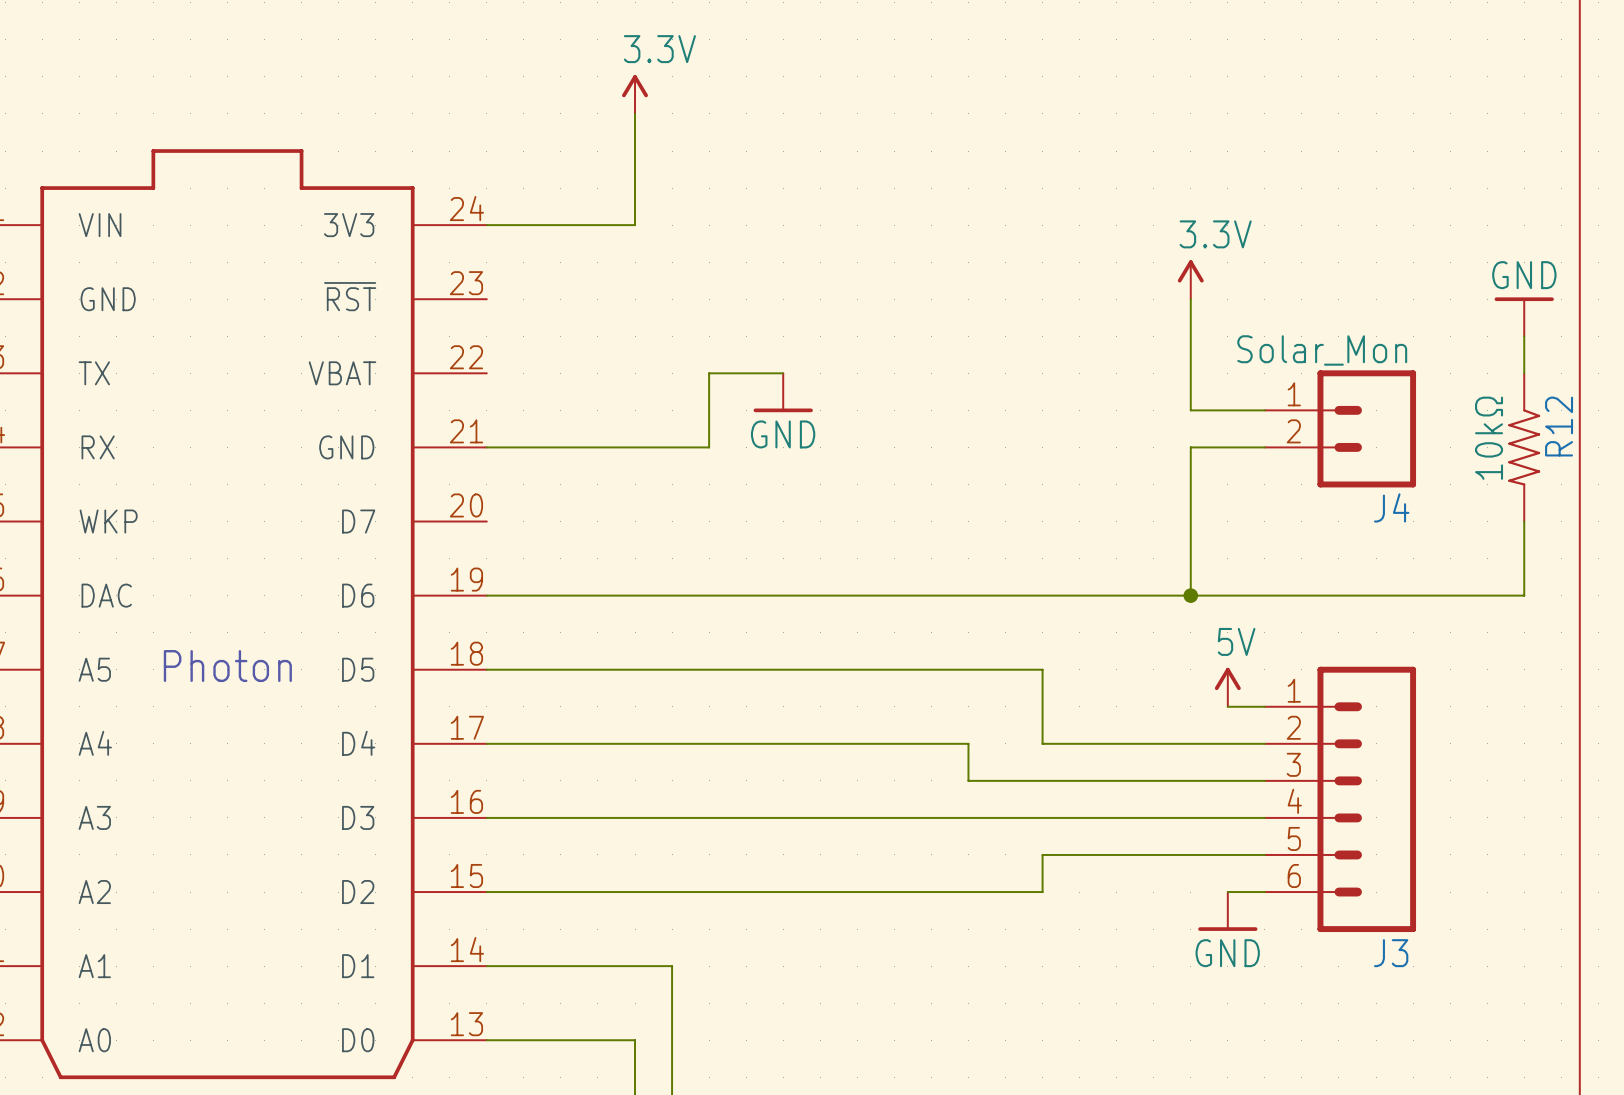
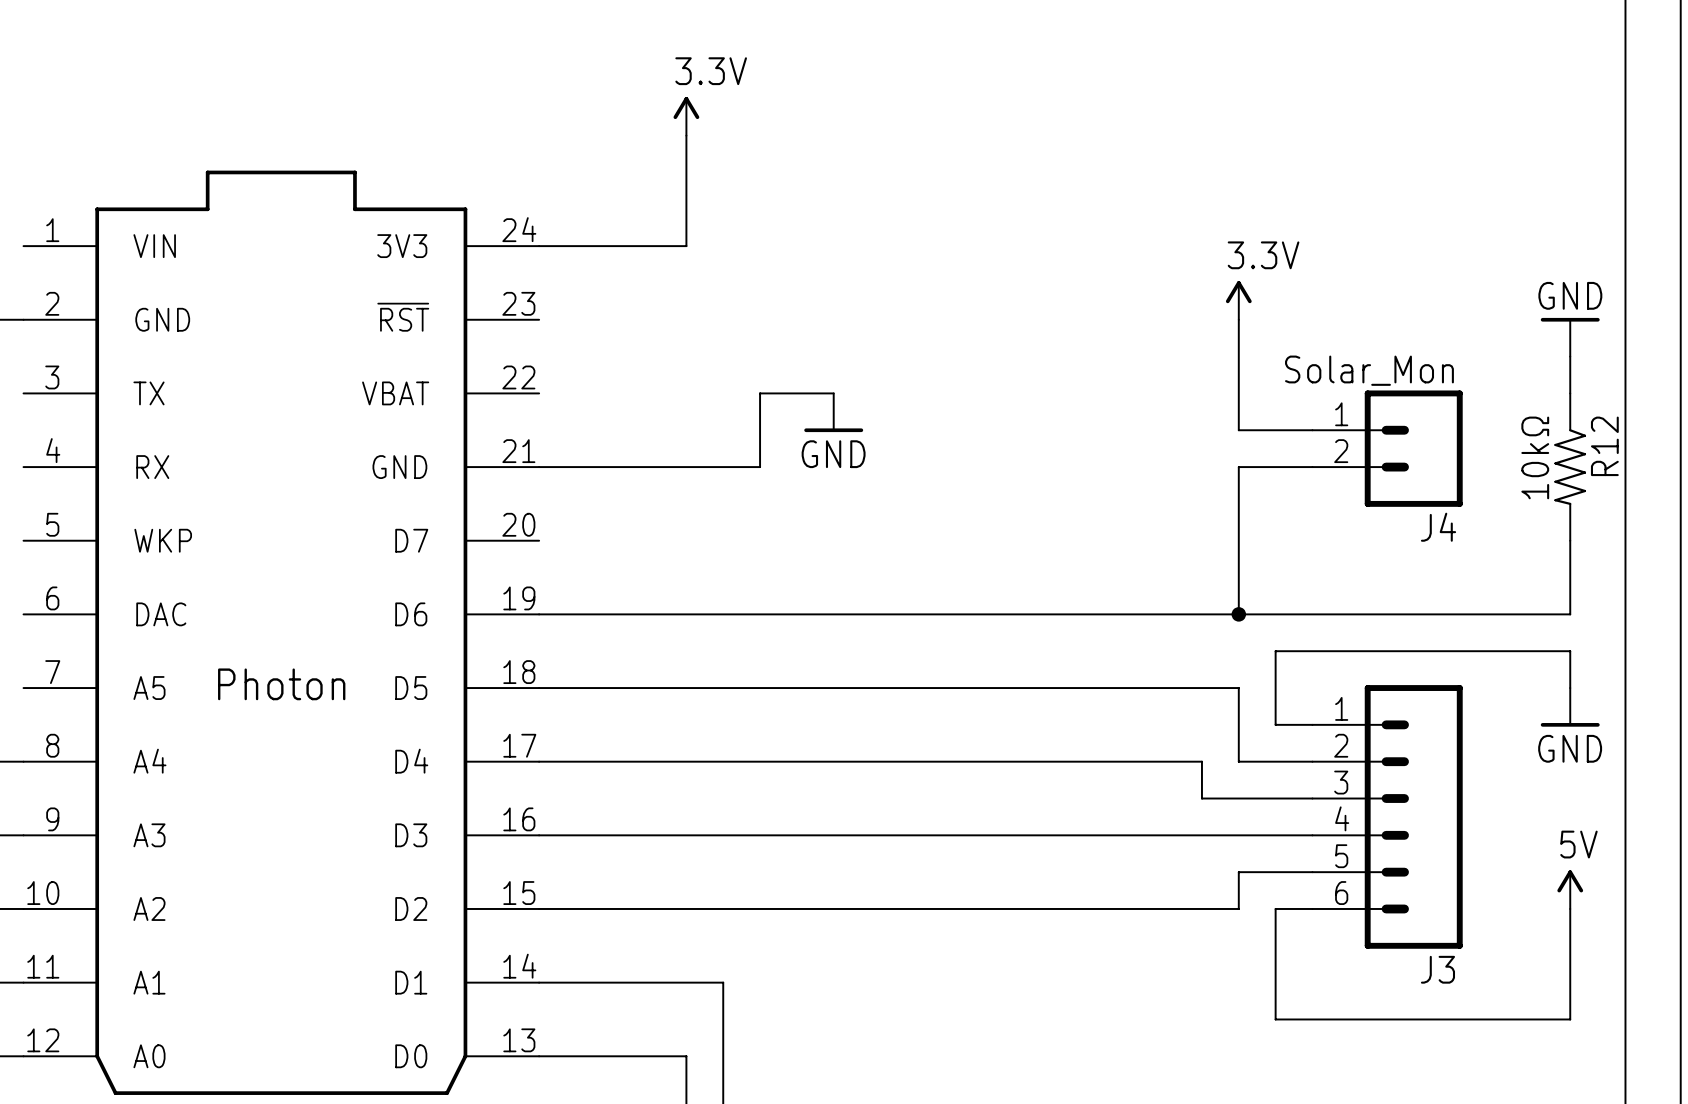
wire: (1042, 669) (1042, 743) -> (1017, 761) (1091, 761)
wire: none -> (1091, 688) (1238, 688) (1238, 761)
wire: none -> (1570, 688) (1570, 651) (1275, 651) (1275, 724)
power symbol position: 5V (1227, 687) -> 5V (1570, 889)
power symbol: none -> GND (1570, 707)
wire: (968, 743) (968, 780) (1153, 780) -> none
wire: (1153, 743) (1190, 743) -> (1201, 761) (1201, 798)
wire: (1190, 854) (1042, 854) (1042, 892) -> (1238, 872) (1238, 908) (1091, 908)
wire: none -> (1275, 908) (1275, 1019) (1570, 1019) (1570, 908)
power symbol: GND (1227, 911) -> none

